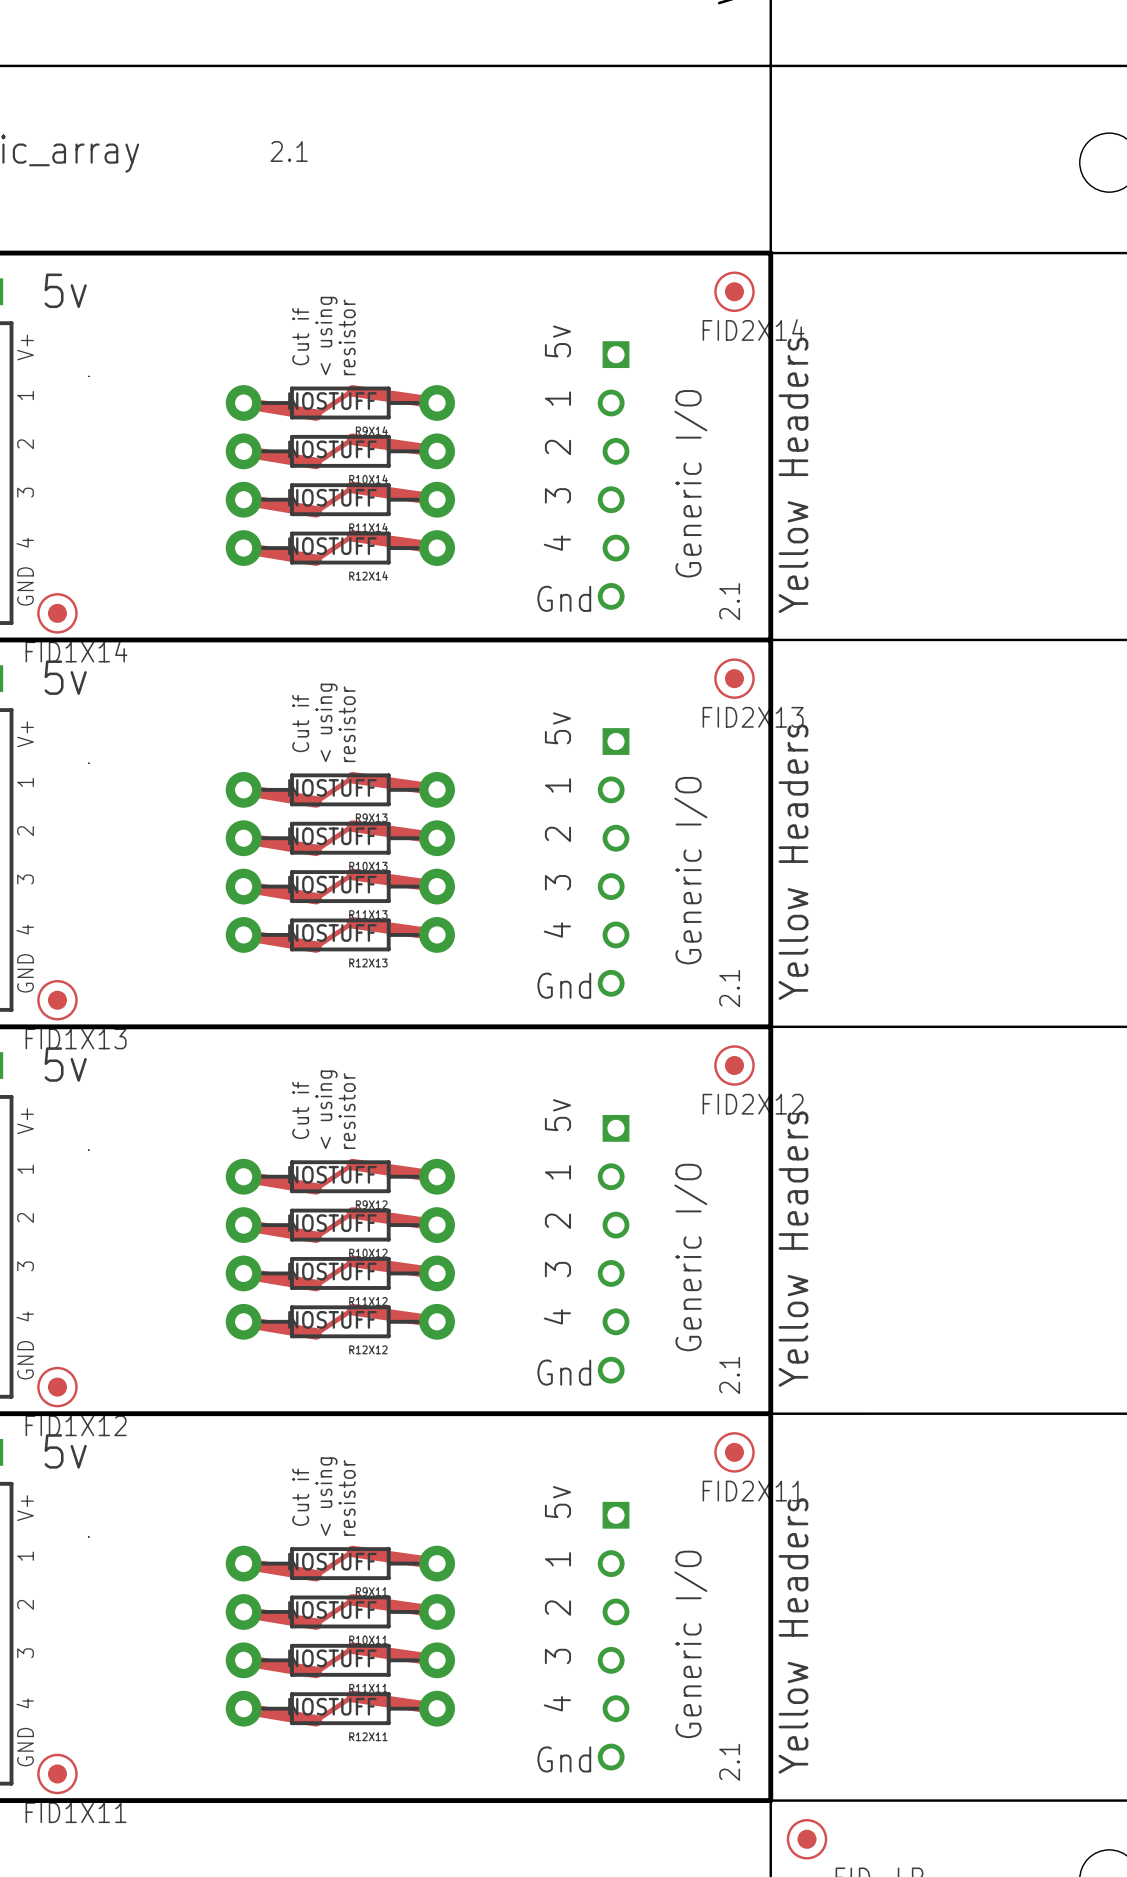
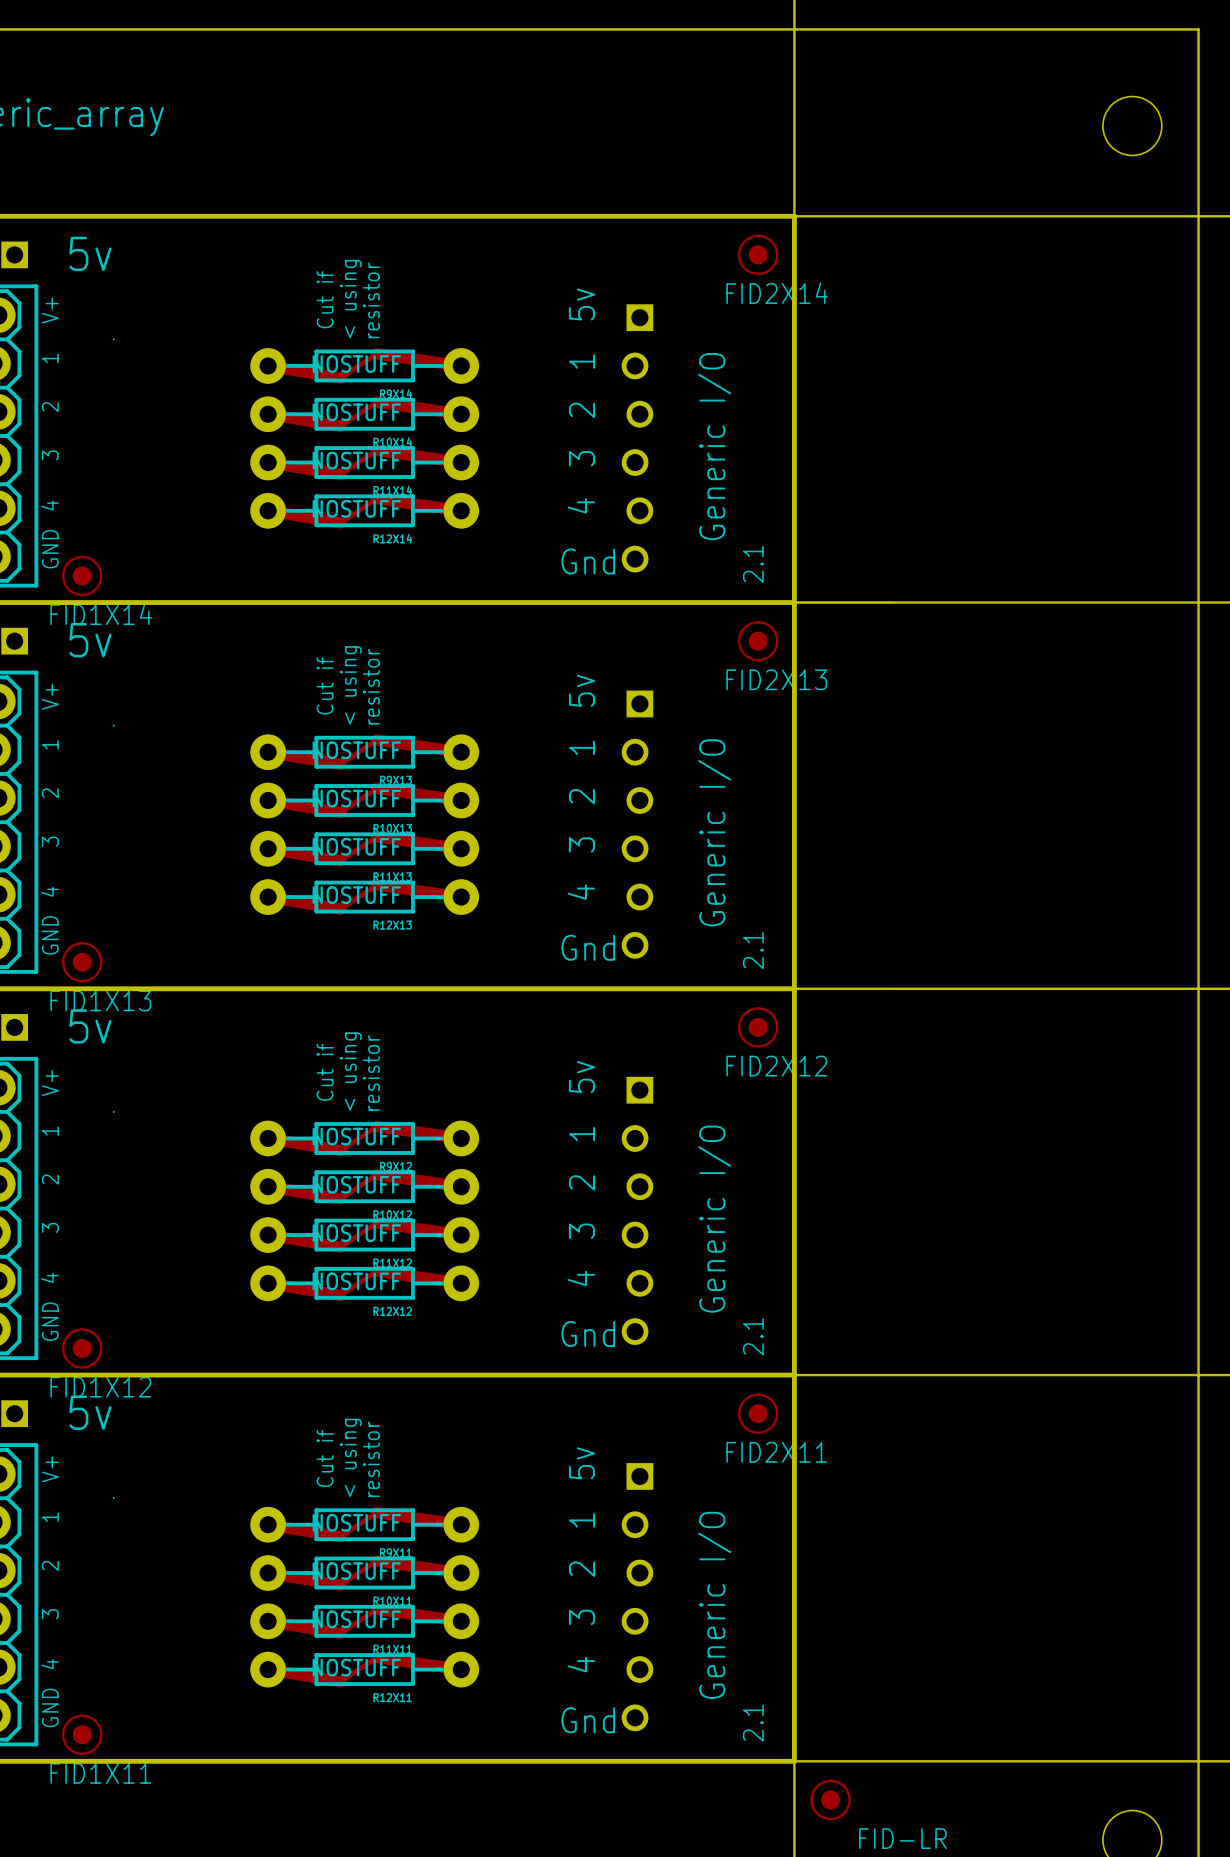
text: 2.1 (289, 151) -> none
text: Yellow Headers (793, 475) -> none
text: Yellow Headers (793, 862) -> none
text: Yellow Headers (793, 1249) -> none
text: Yellow Headers (793, 1635) -> none

